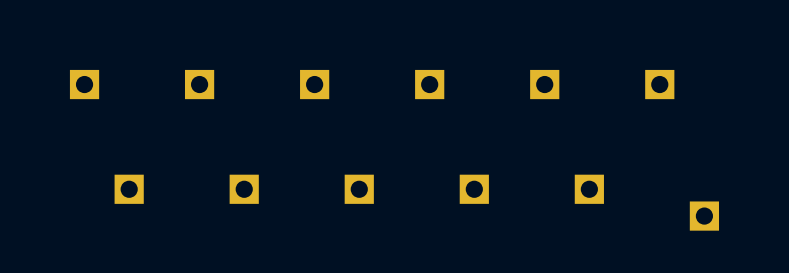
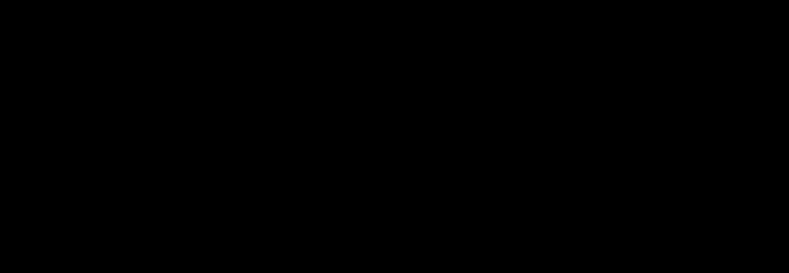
part: (84, 84) -> none
part: (199, 84) -> none
part: (314, 84) -> none
part: (429, 84) -> none
part: (544, 84) -> none
part: (659, 84) -> none
part: (129, 189) -> none
part: (244, 189) -> none
part: (359, 189) -> none
part: (474, 189) -> none
part: (589, 189) -> none
part: (704, 216) -> none

